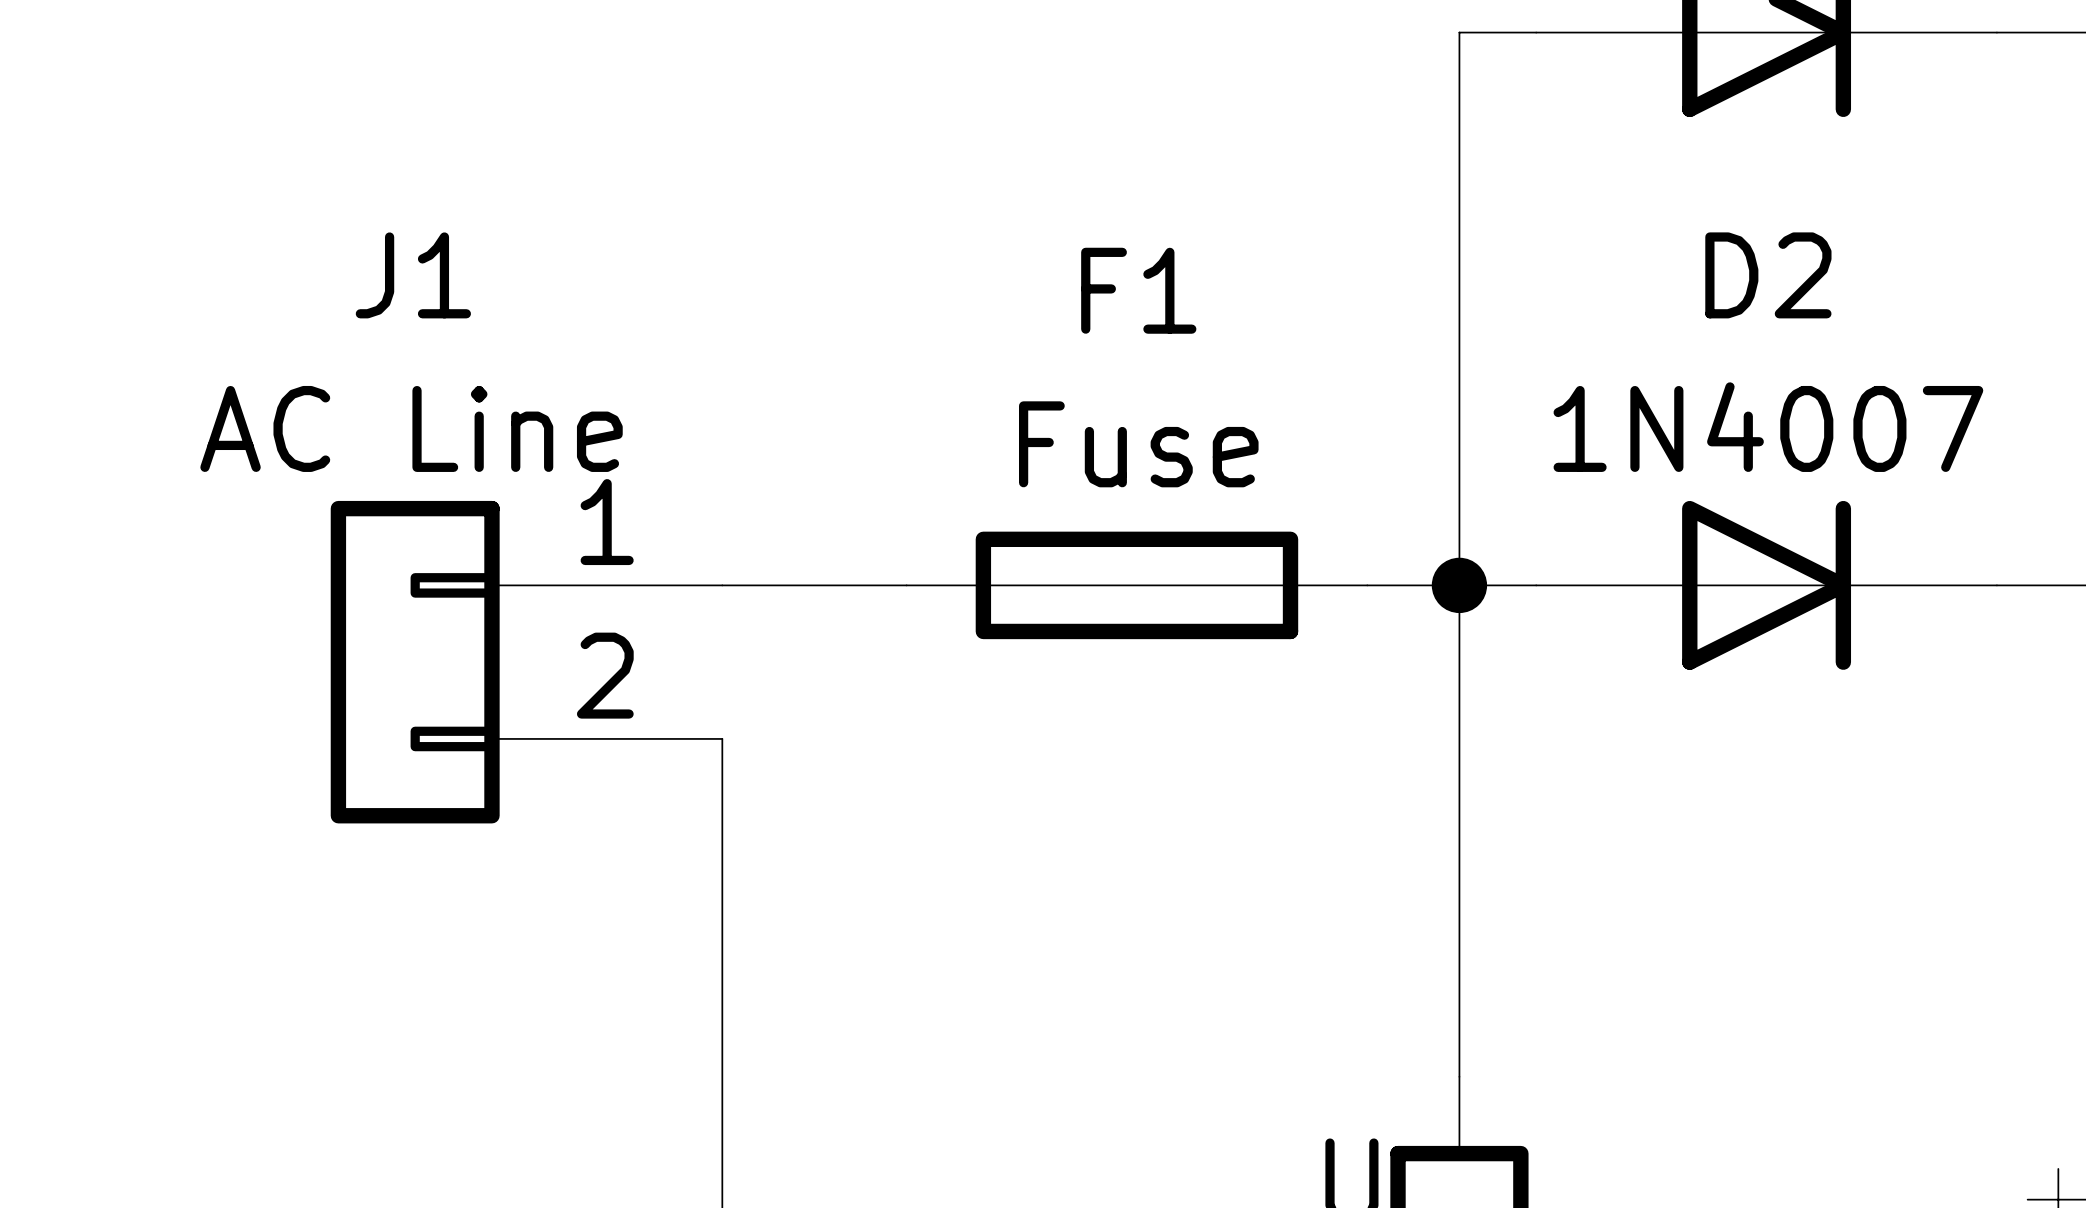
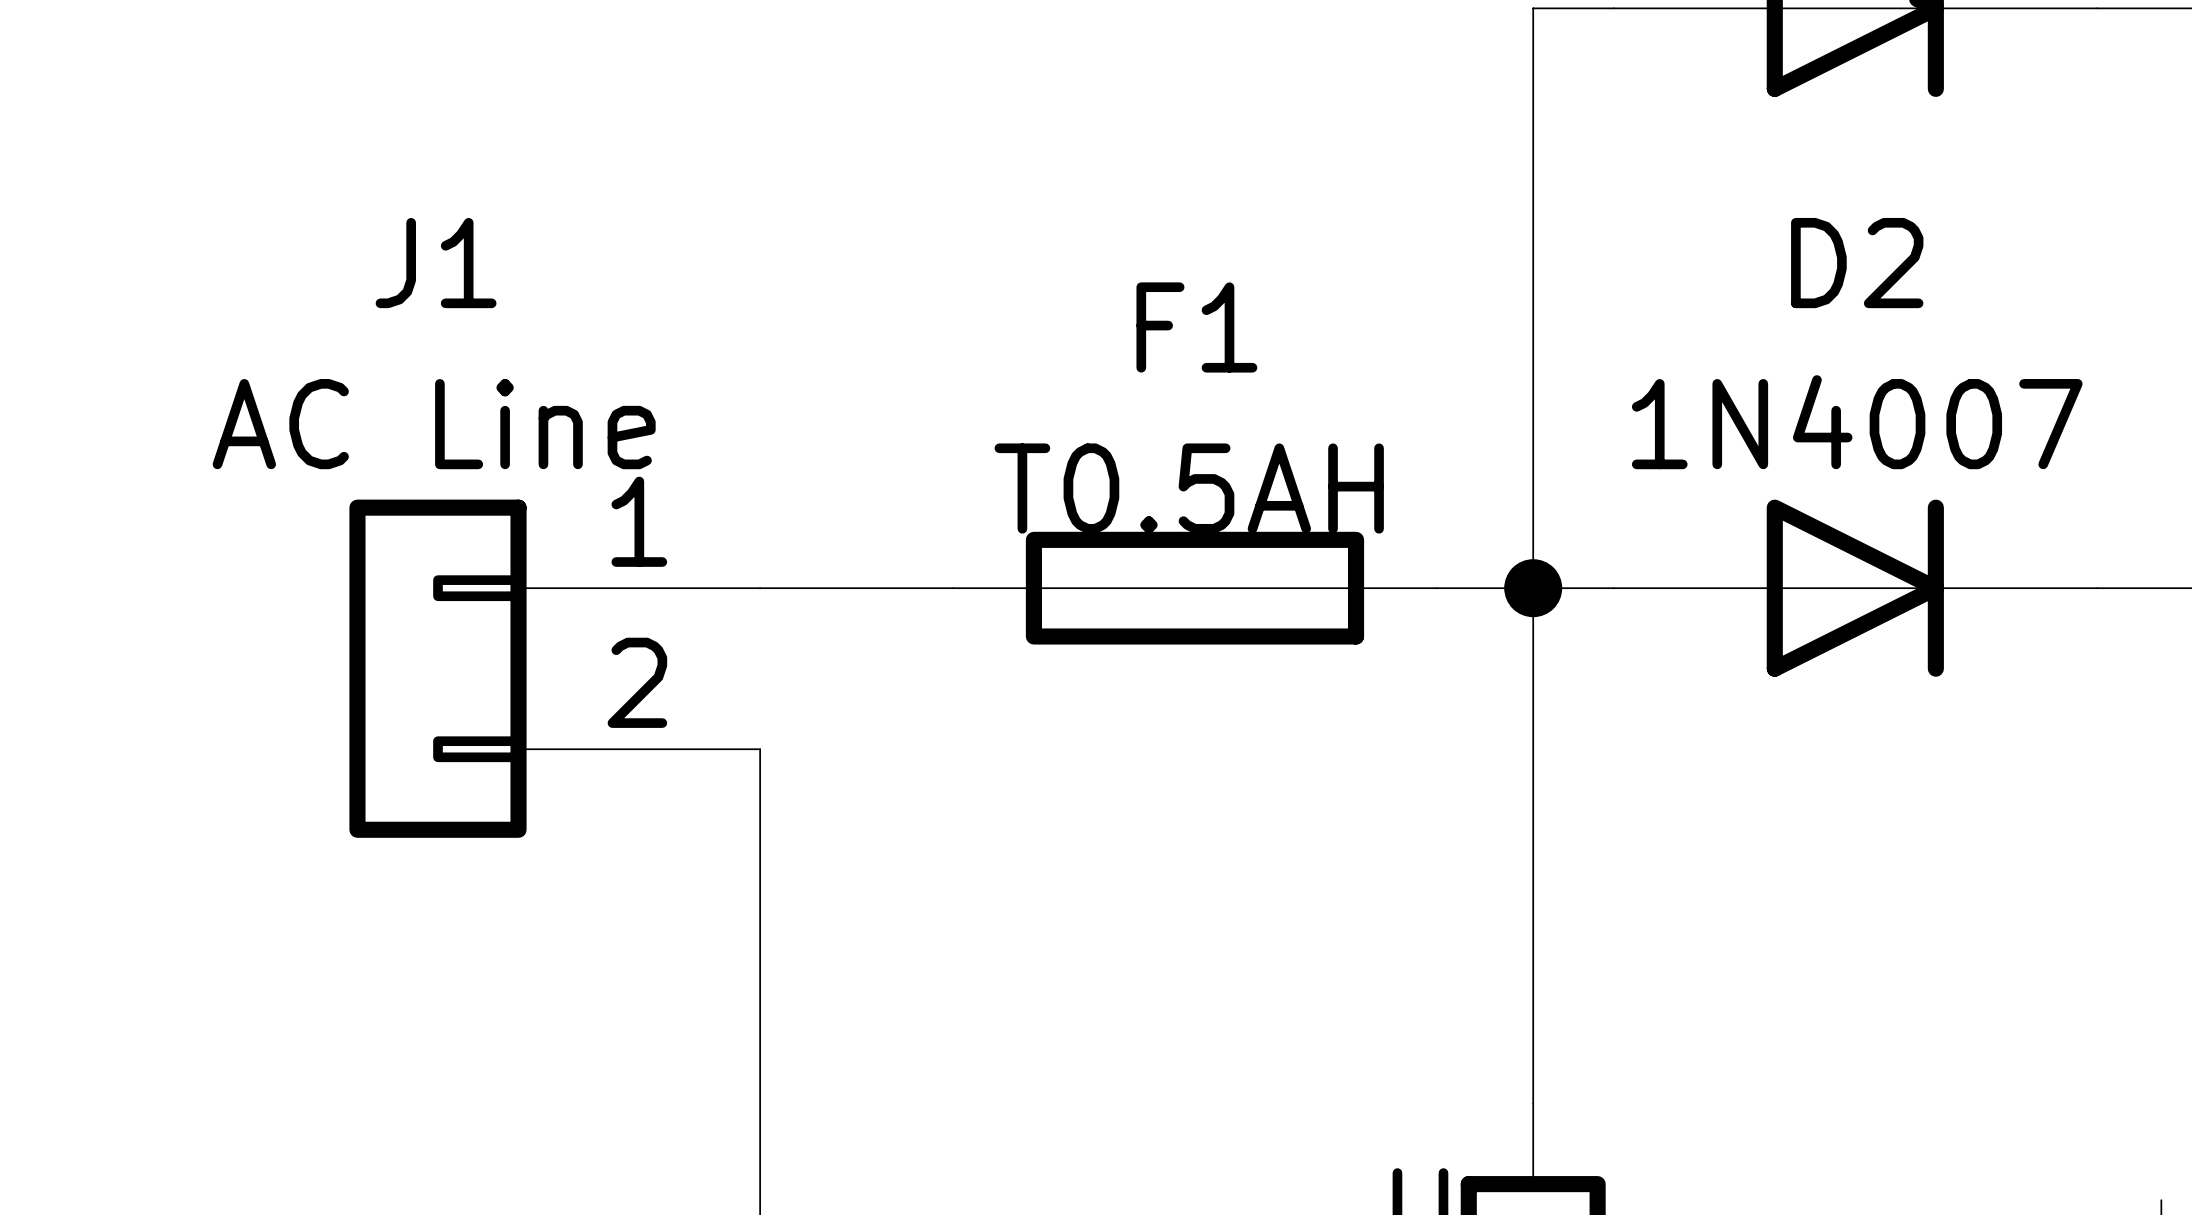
F1 name position: F1 (1138, 290) -> F1 (1196, 327)
F1 value: Fuse (1138, 444) -> T0.5AH (1189, 488)

